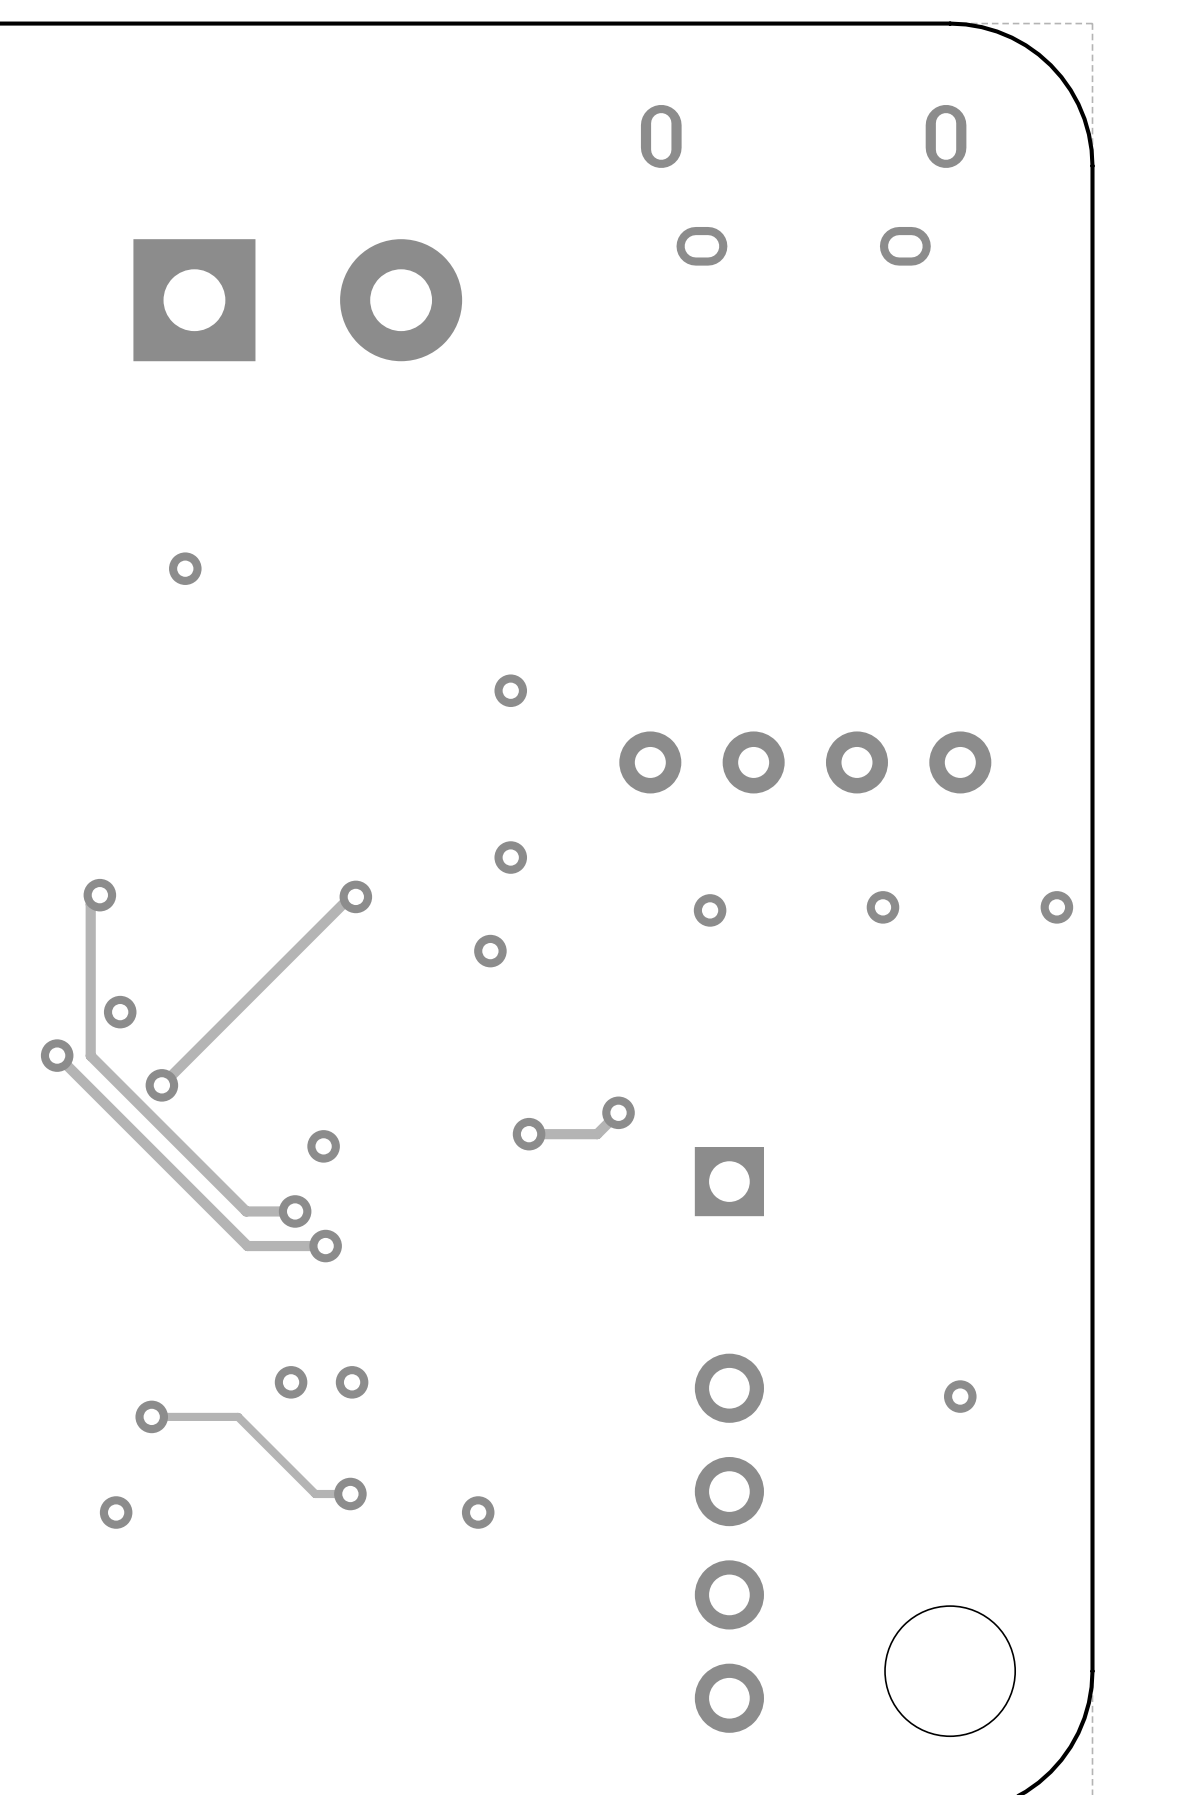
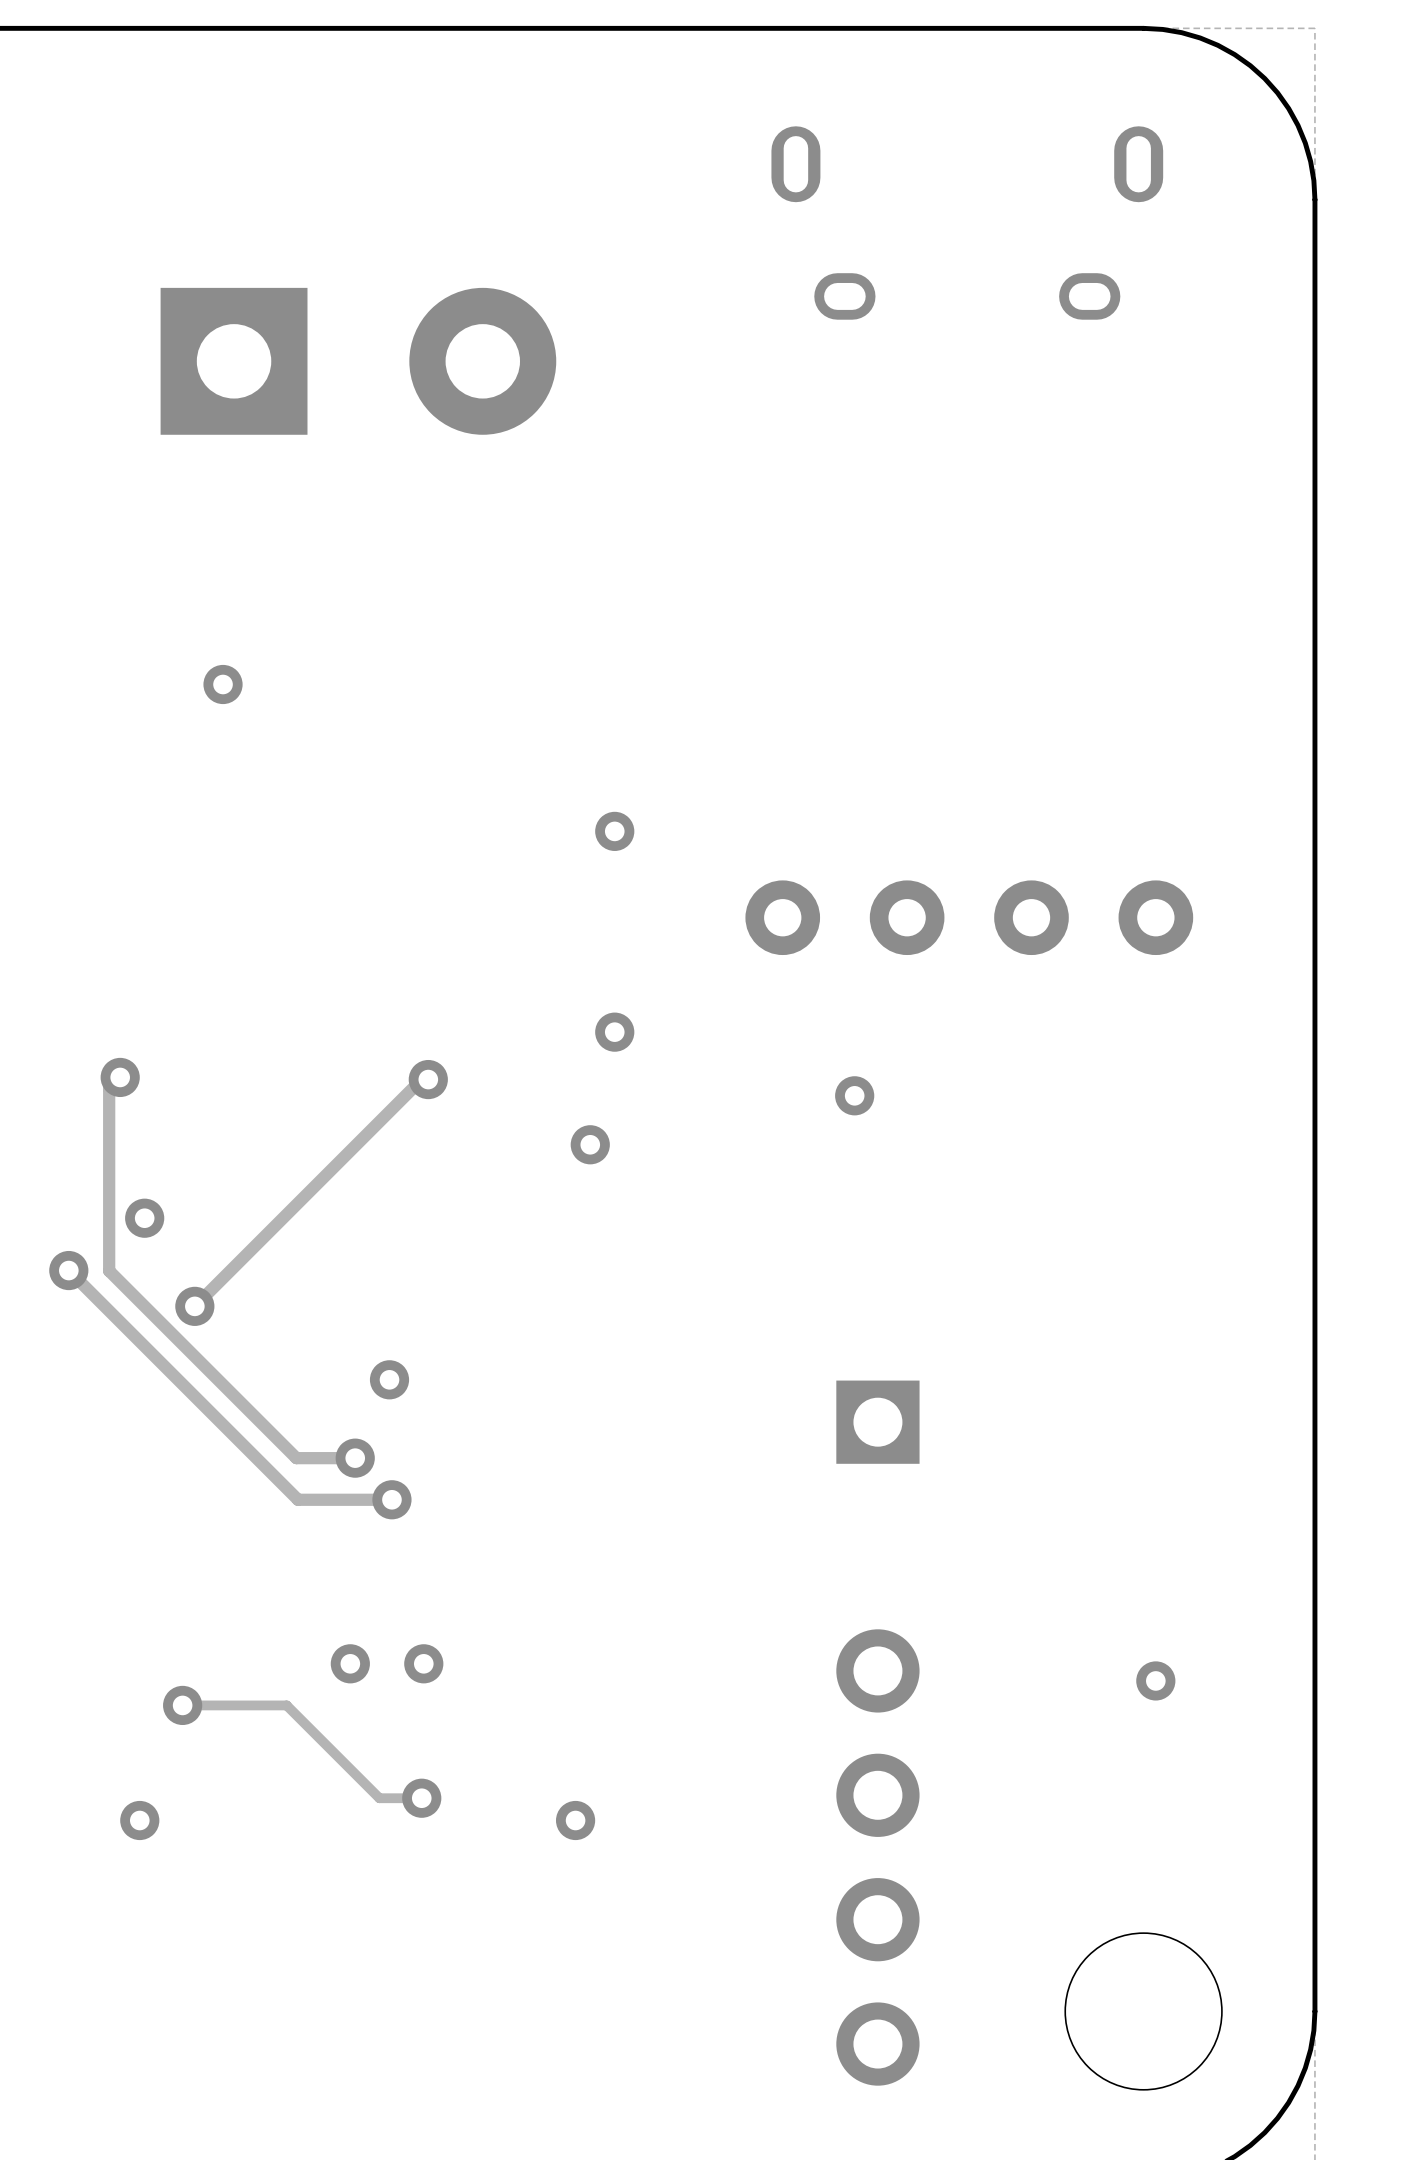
via: (882, 907) -> none
via: (1056, 907) -> none
track: (618, 1112) (597, 1134) (529, 1134) -> none
via: (618, 1112) -> none
via: (529, 1134) -> none

